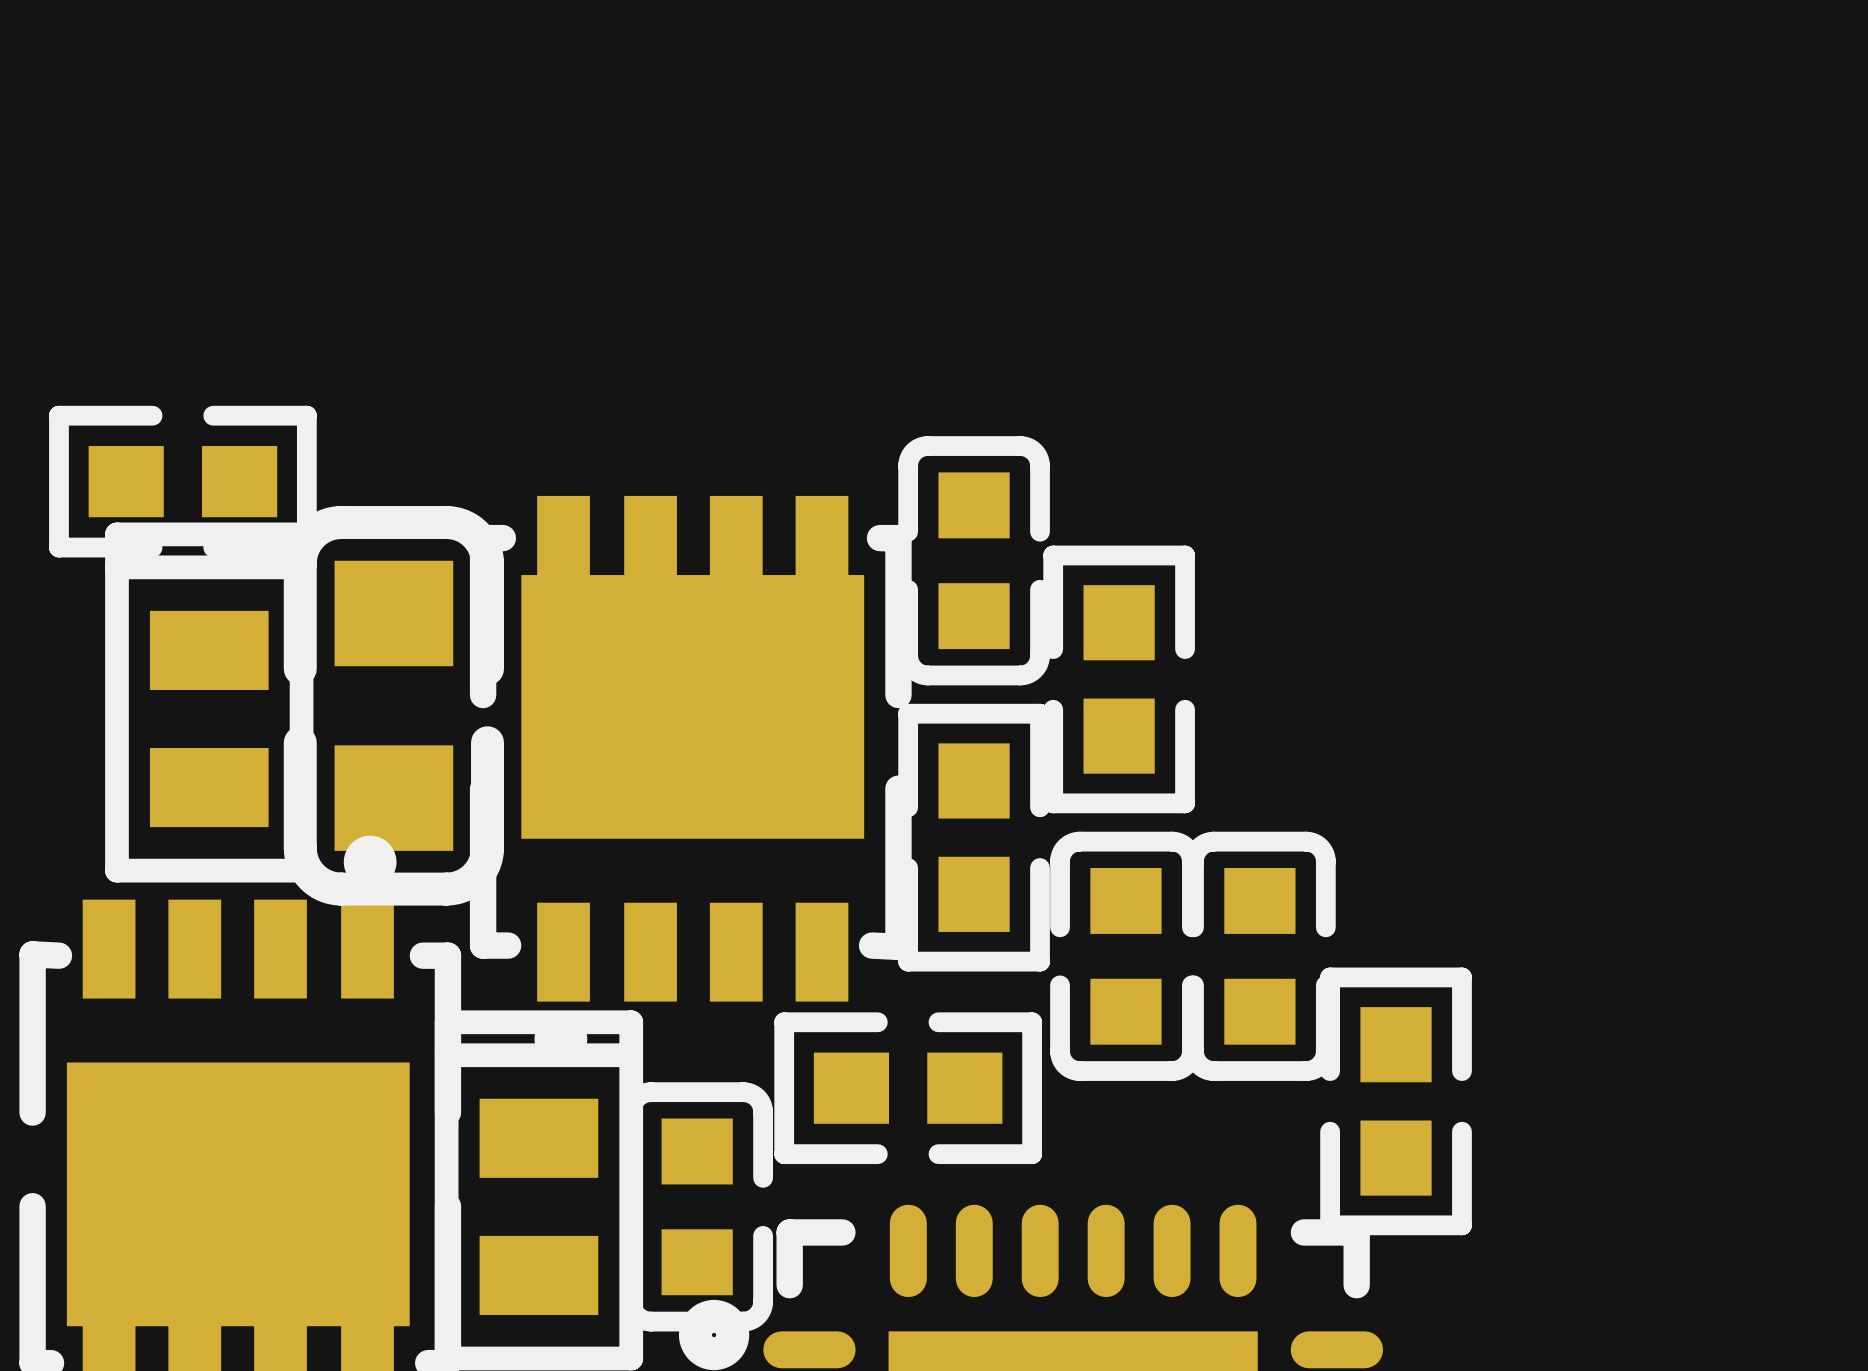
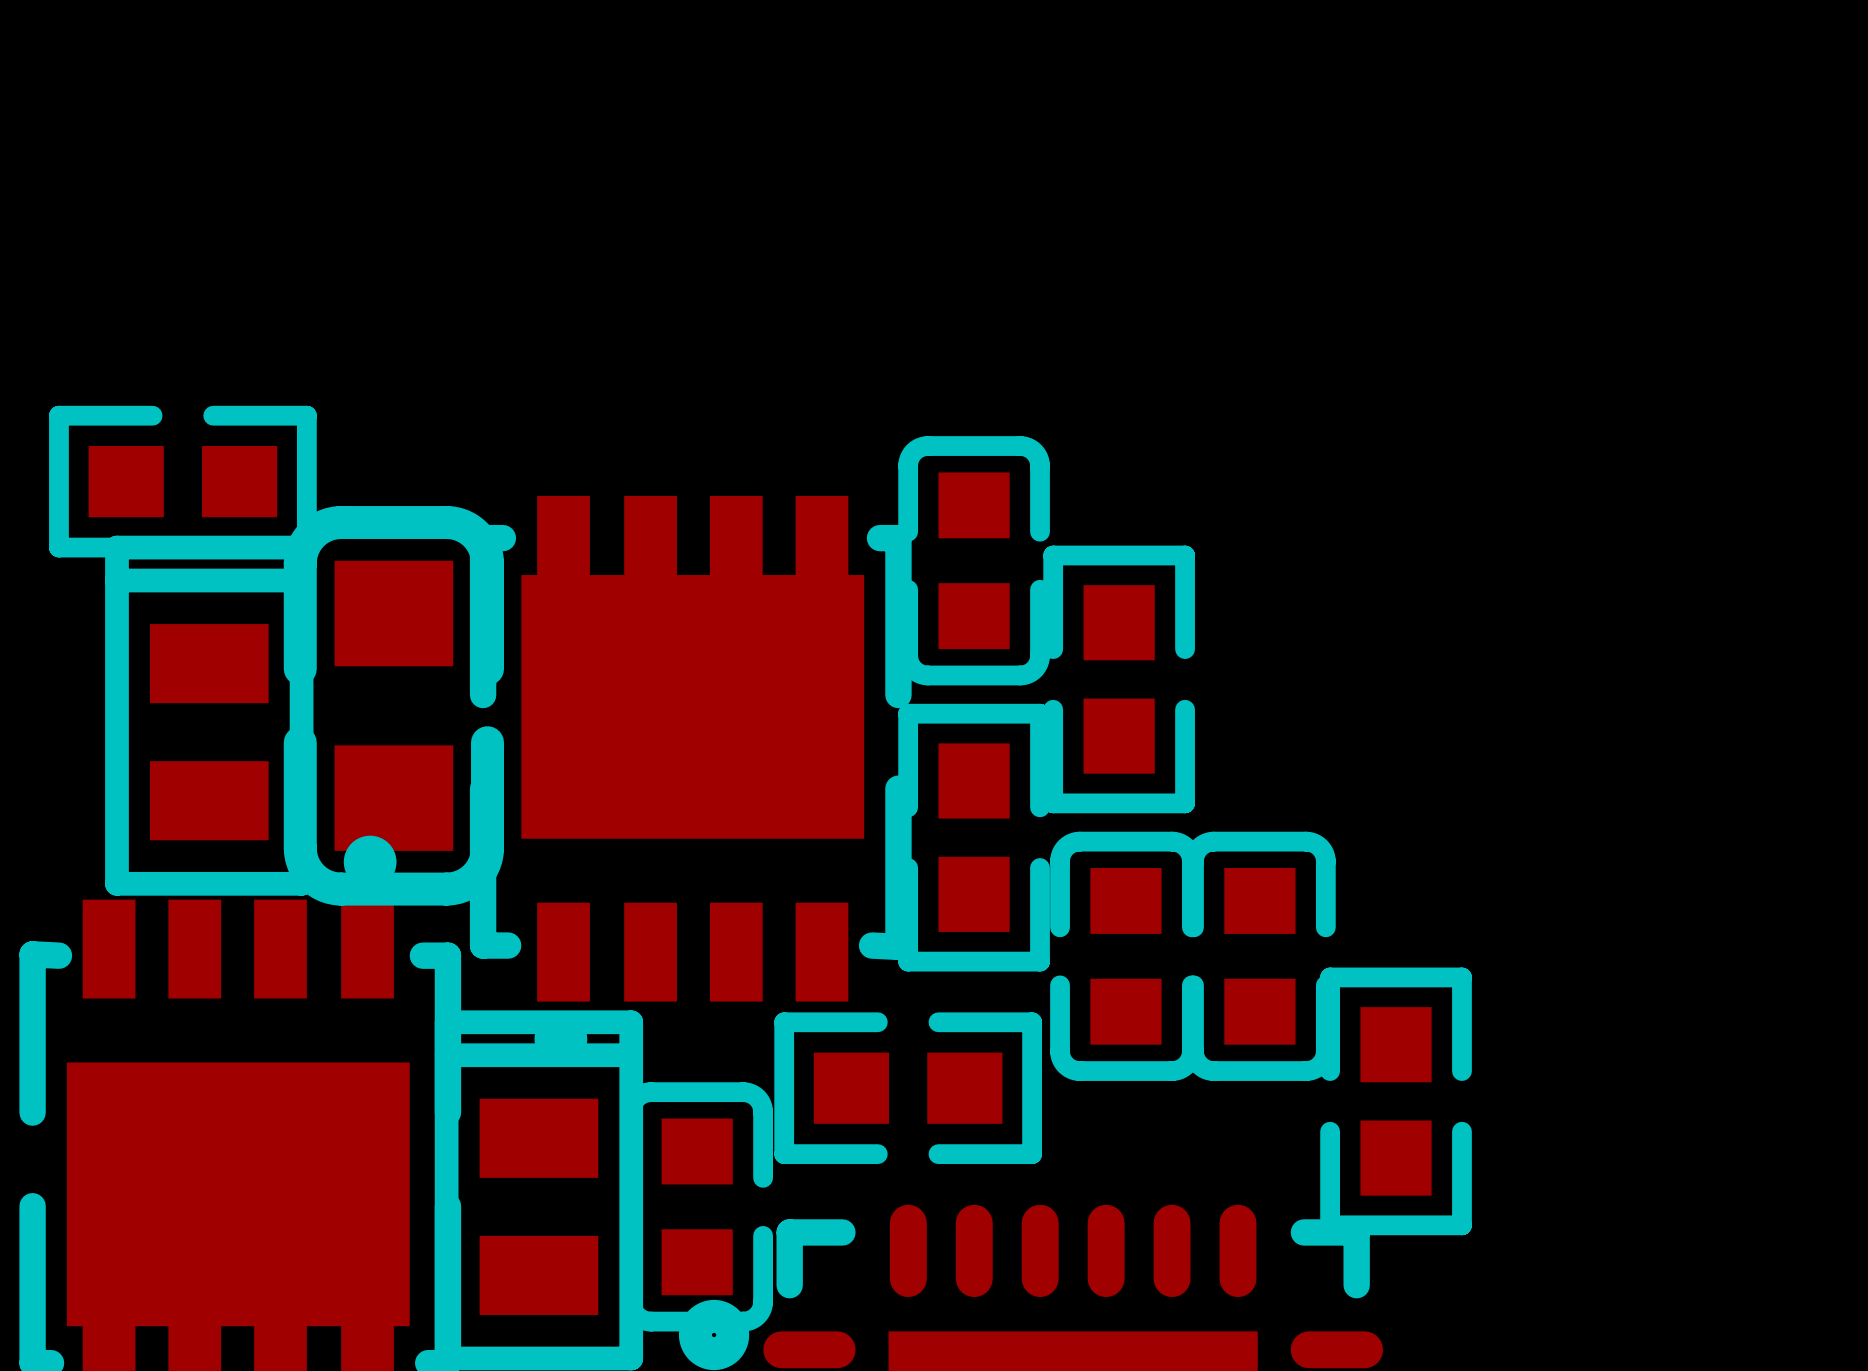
part position: (209, 702) -> (209, 715)

